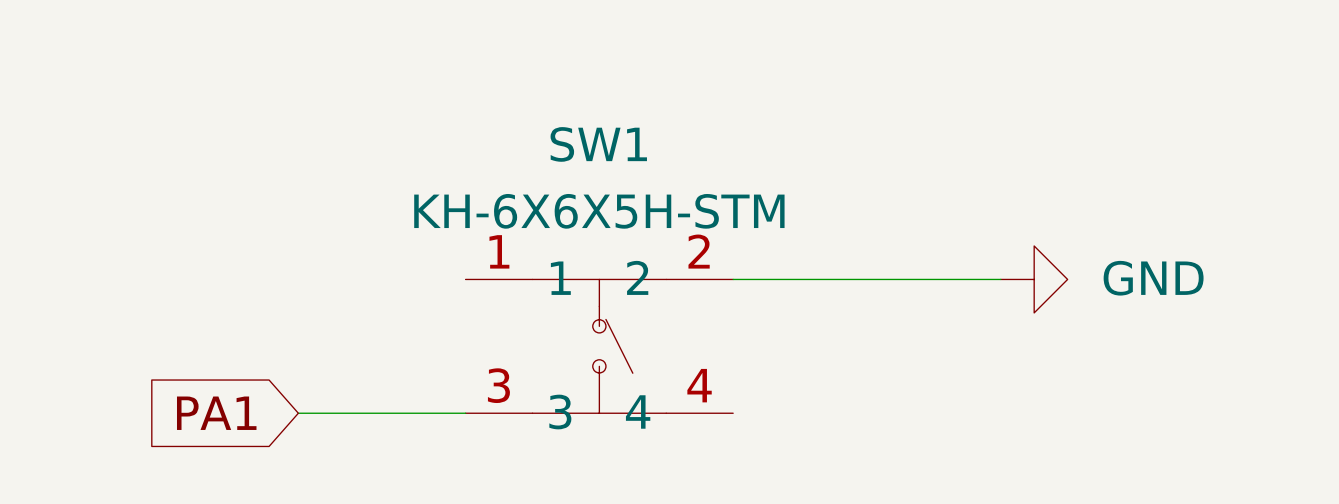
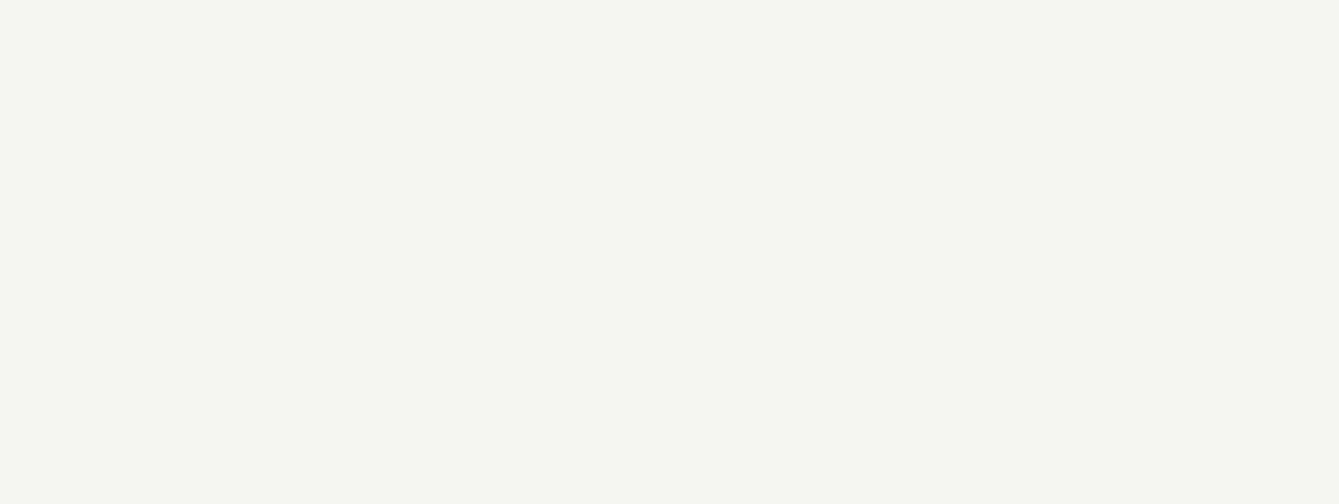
wire: (733, 279) (1000, 279) -> none
power symbol: GND (1034, 279) -> none
SW1: KH-6X6X5H-STM (599, 346) -> none
global label: PA1 (216, 413) -> none
wire: (298, 413) (465, 413) -> none

